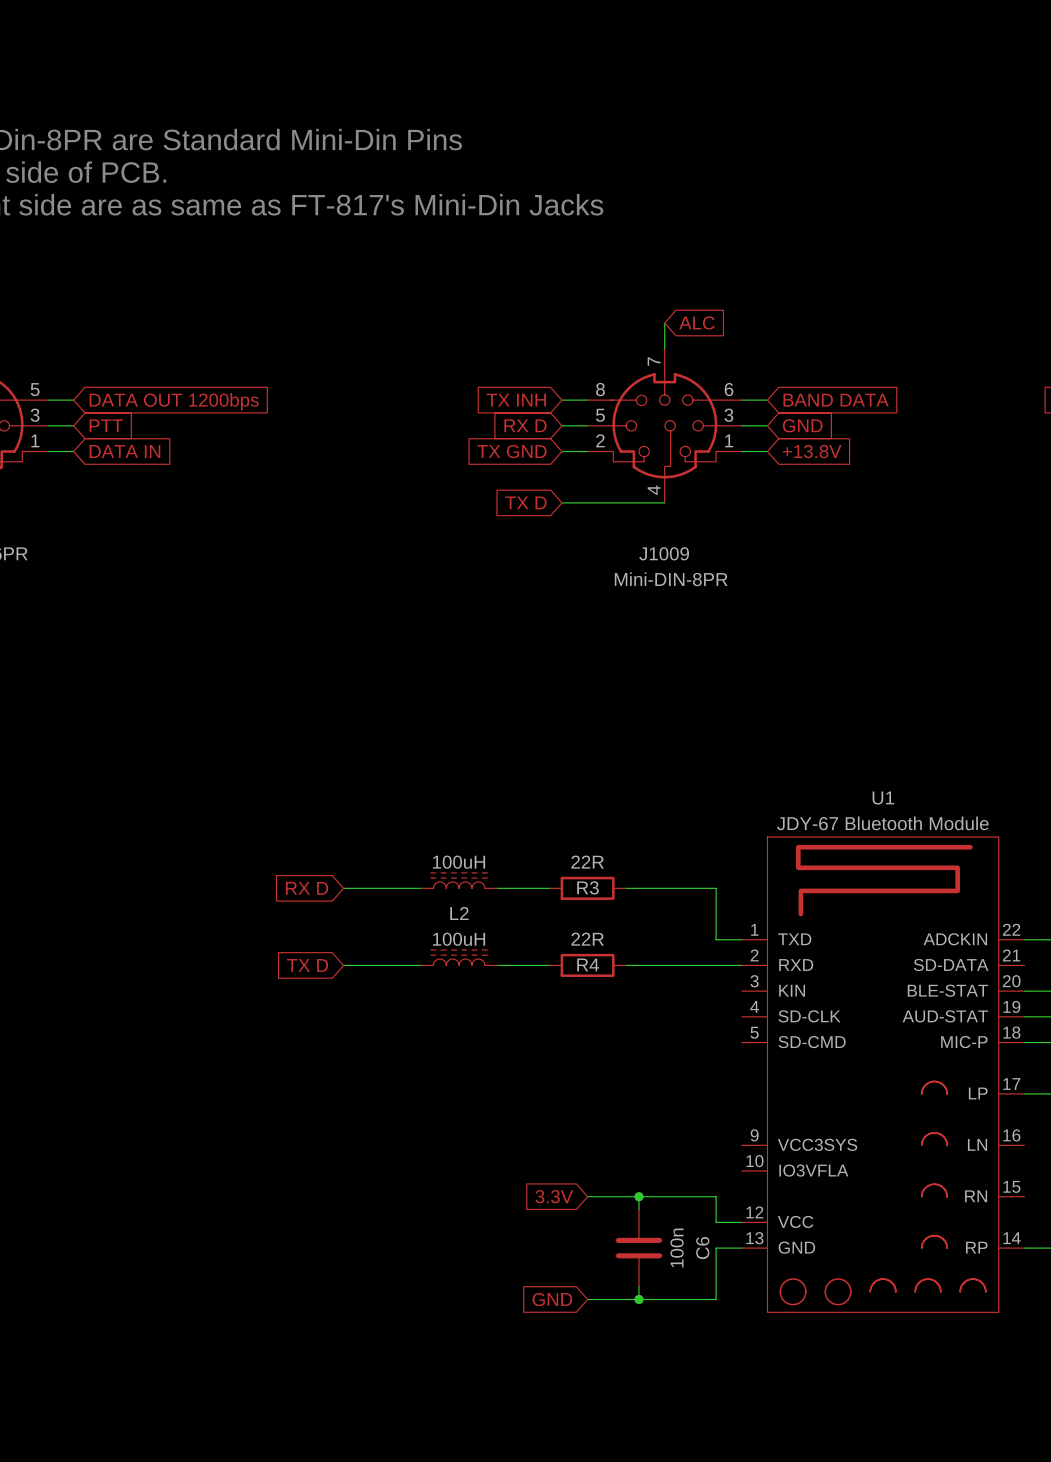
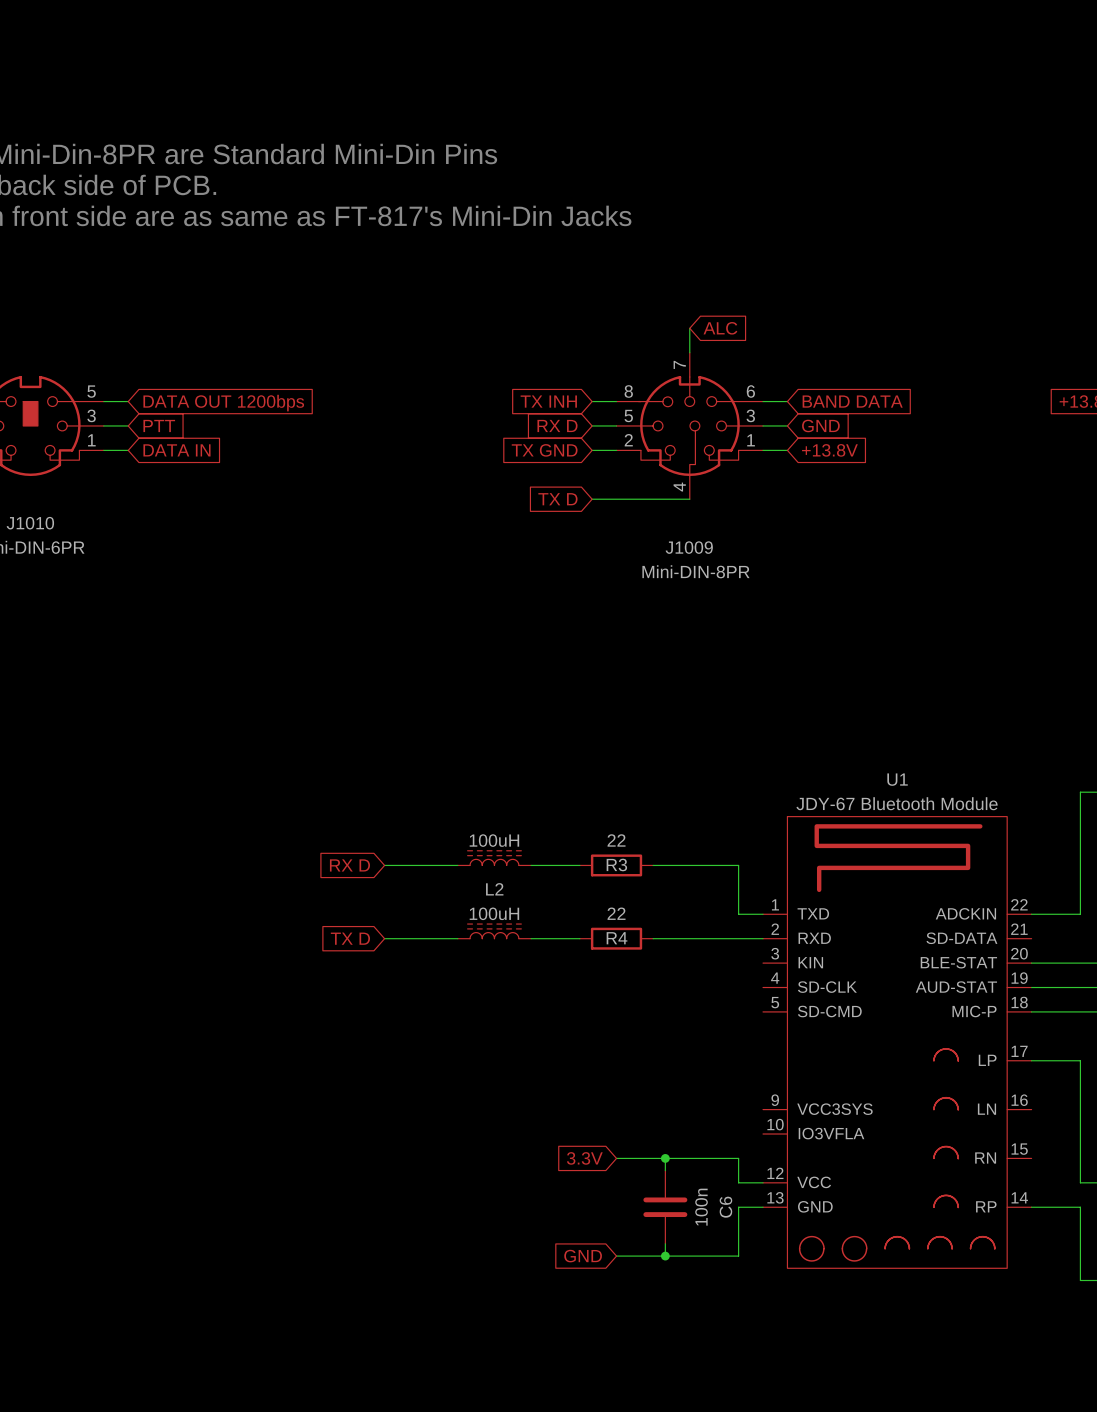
R3 value: 22R (587, 862) -> 22 (616, 840)
R4 value: 22R (587, 939) -> 22 (616, 913)

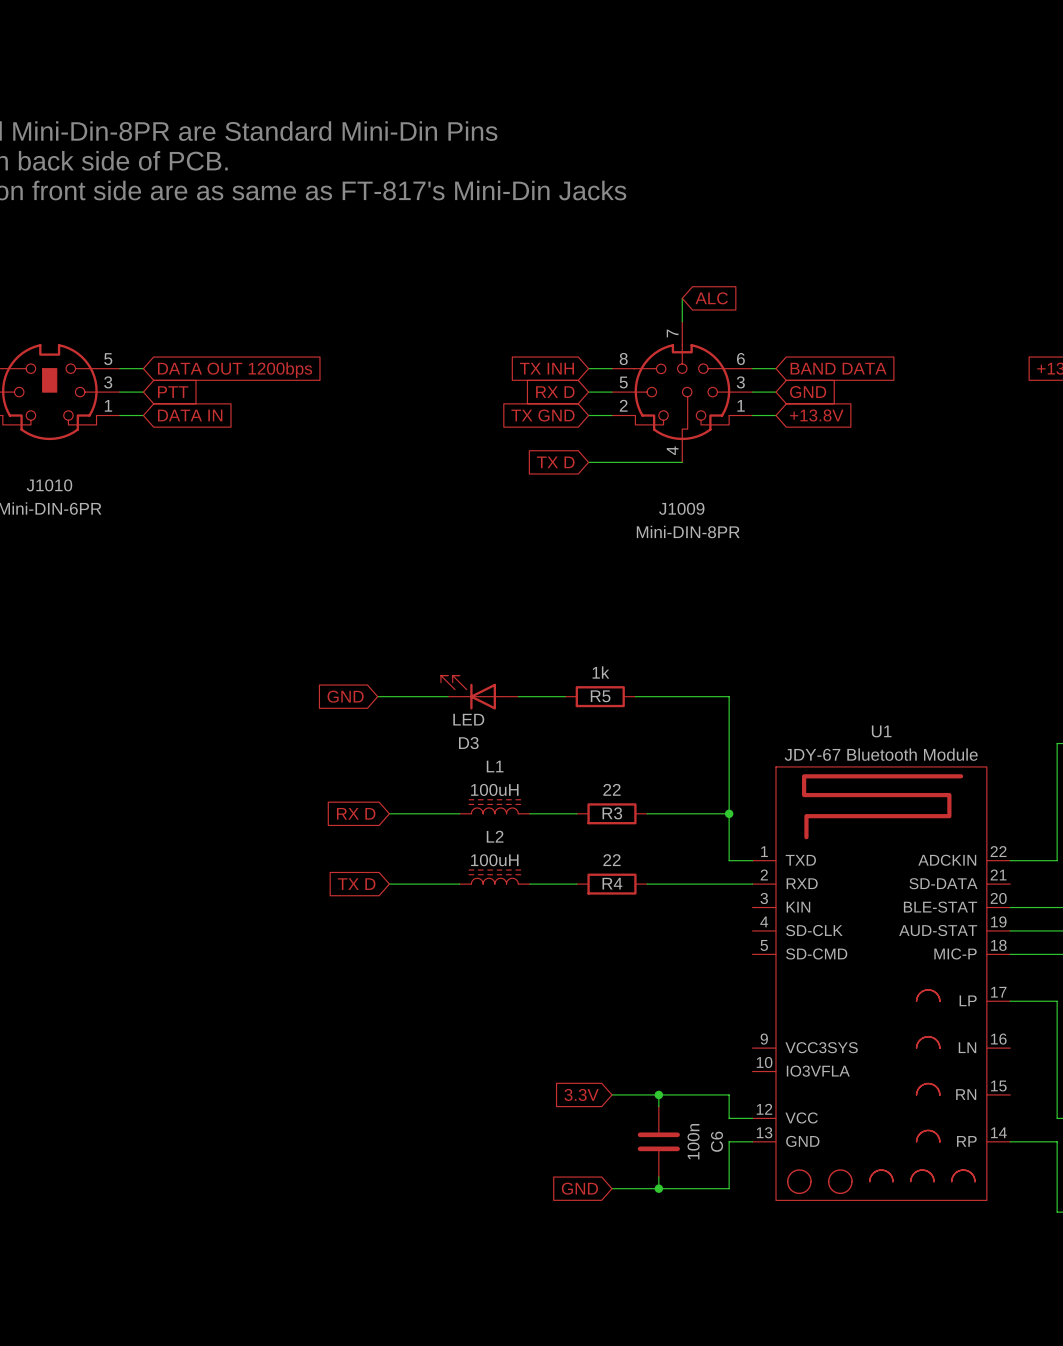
D3: none -> LED (479, 692)
global label: none -> GND (345, 696)
wire: none -> (377, 696) (447, 696)
wire: none -> (518, 696) (565, 696)
R5: none -> 1k (600, 696)
wire: none -> (635, 696) (729, 696) (729, 813)
L1 name: none -> L1 (495, 766)
junction: none -> (729, 813)

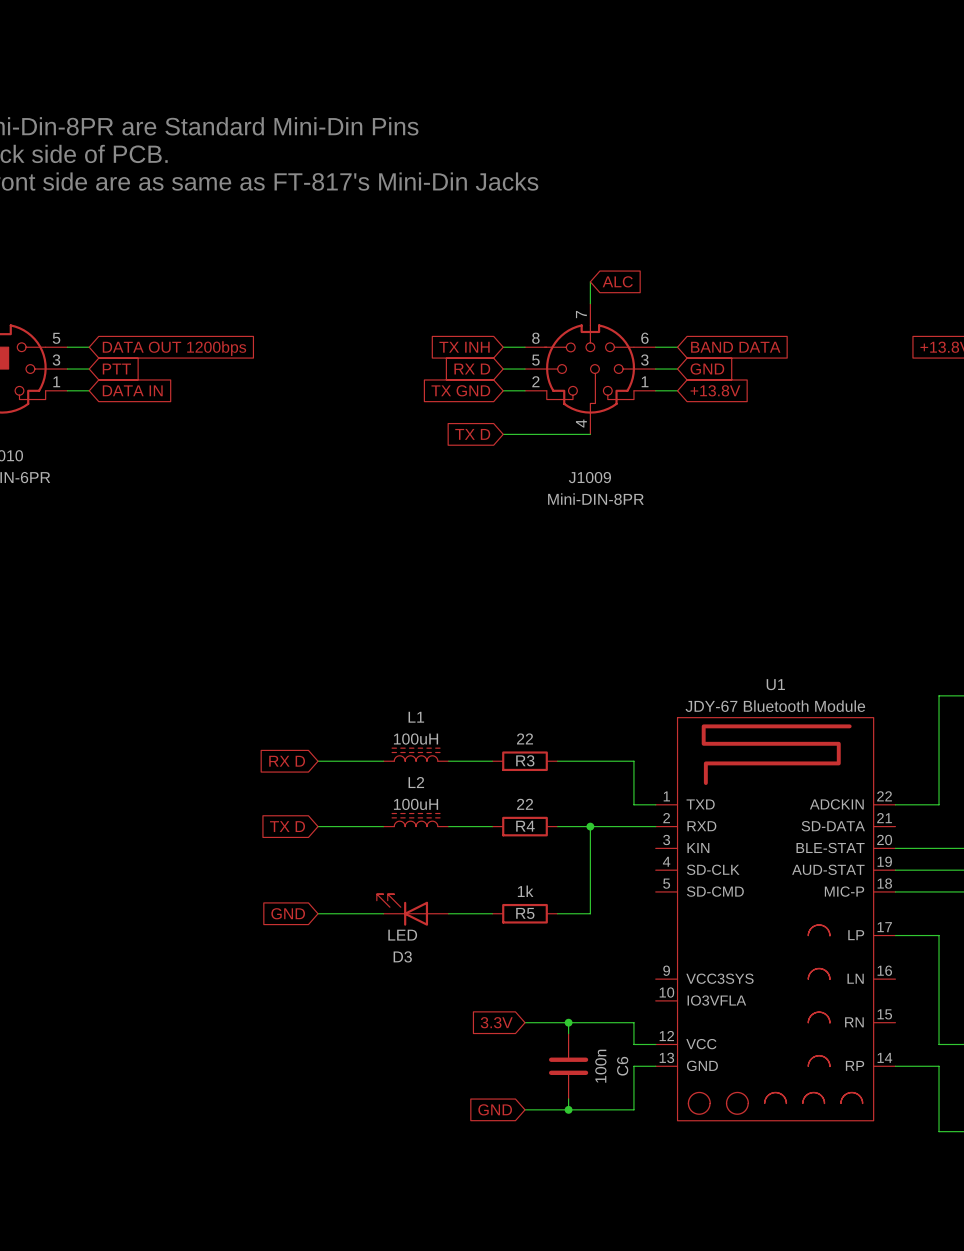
D3 position: (479, 692) -> (412, 909)
global label: GND (345, 696) -> none
wire: (377, 696) (447, 696) -> none
wire: (518, 696) (565, 696) -> none
R5 position: (600, 696) -> (525, 913)
wire: (635, 696) (729, 696) (729, 813) -> none
junction: (729, 813) -> none
wire: none -> (590, 826) (590, 913) (557, 913)
junction: none -> (590, 826)
global label: none -> GND (288, 913)
wire: none -> (318, 913) (383, 913)
wire: none -> (448, 913) (492, 913)

